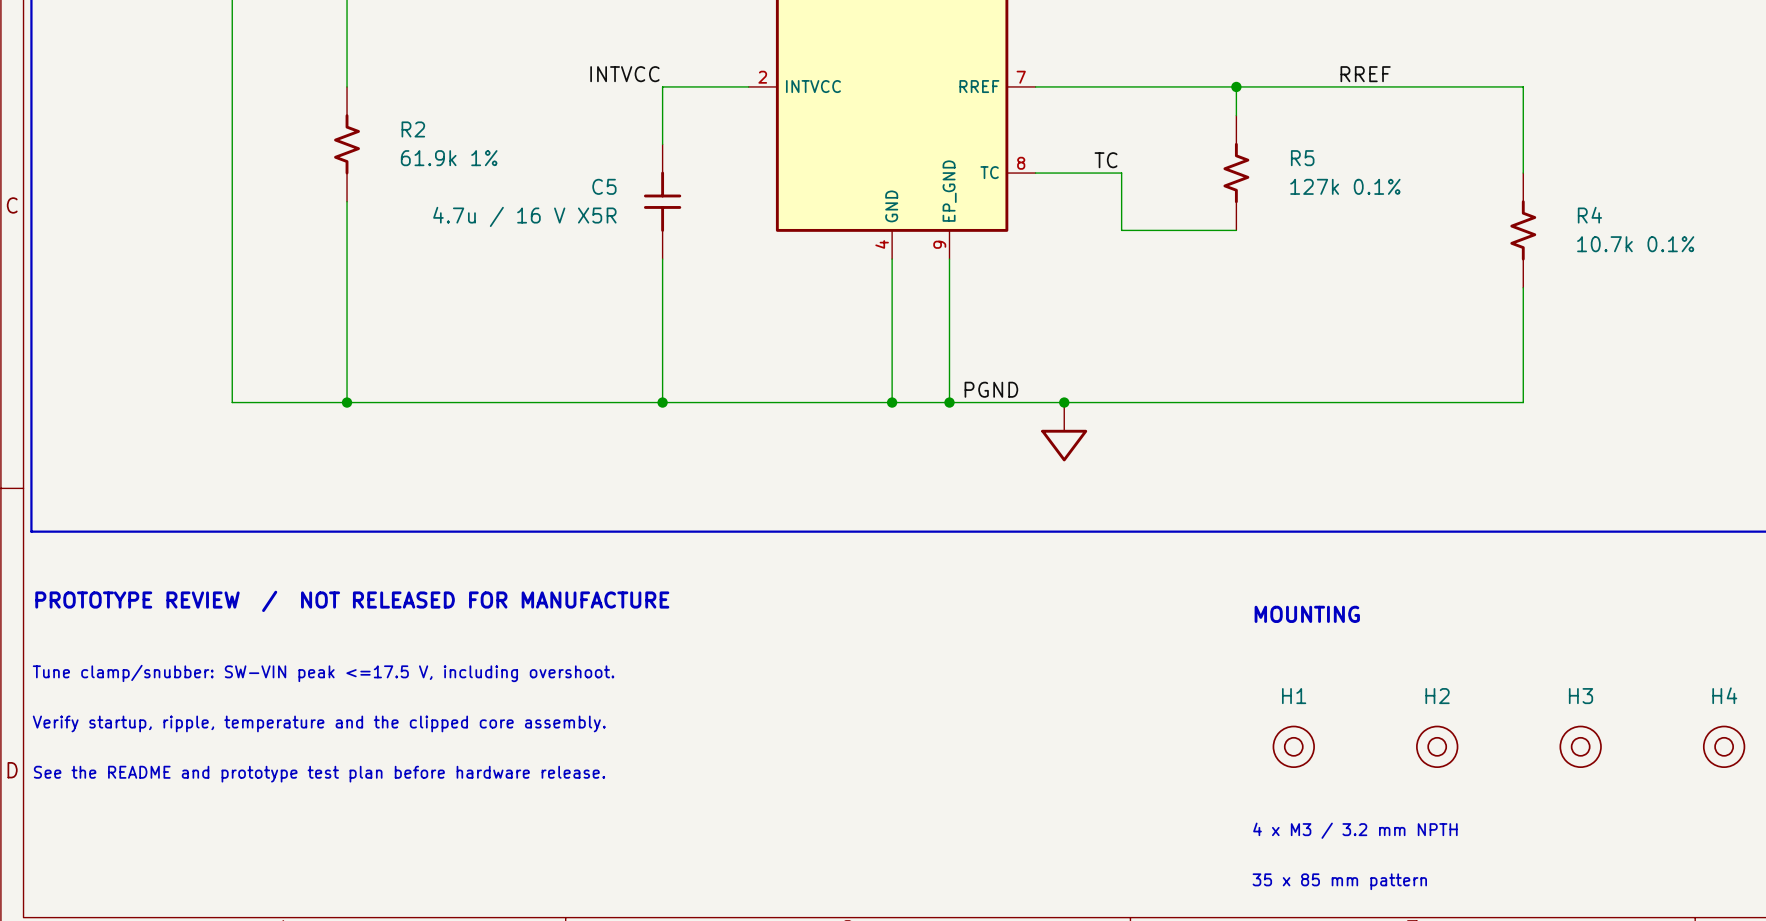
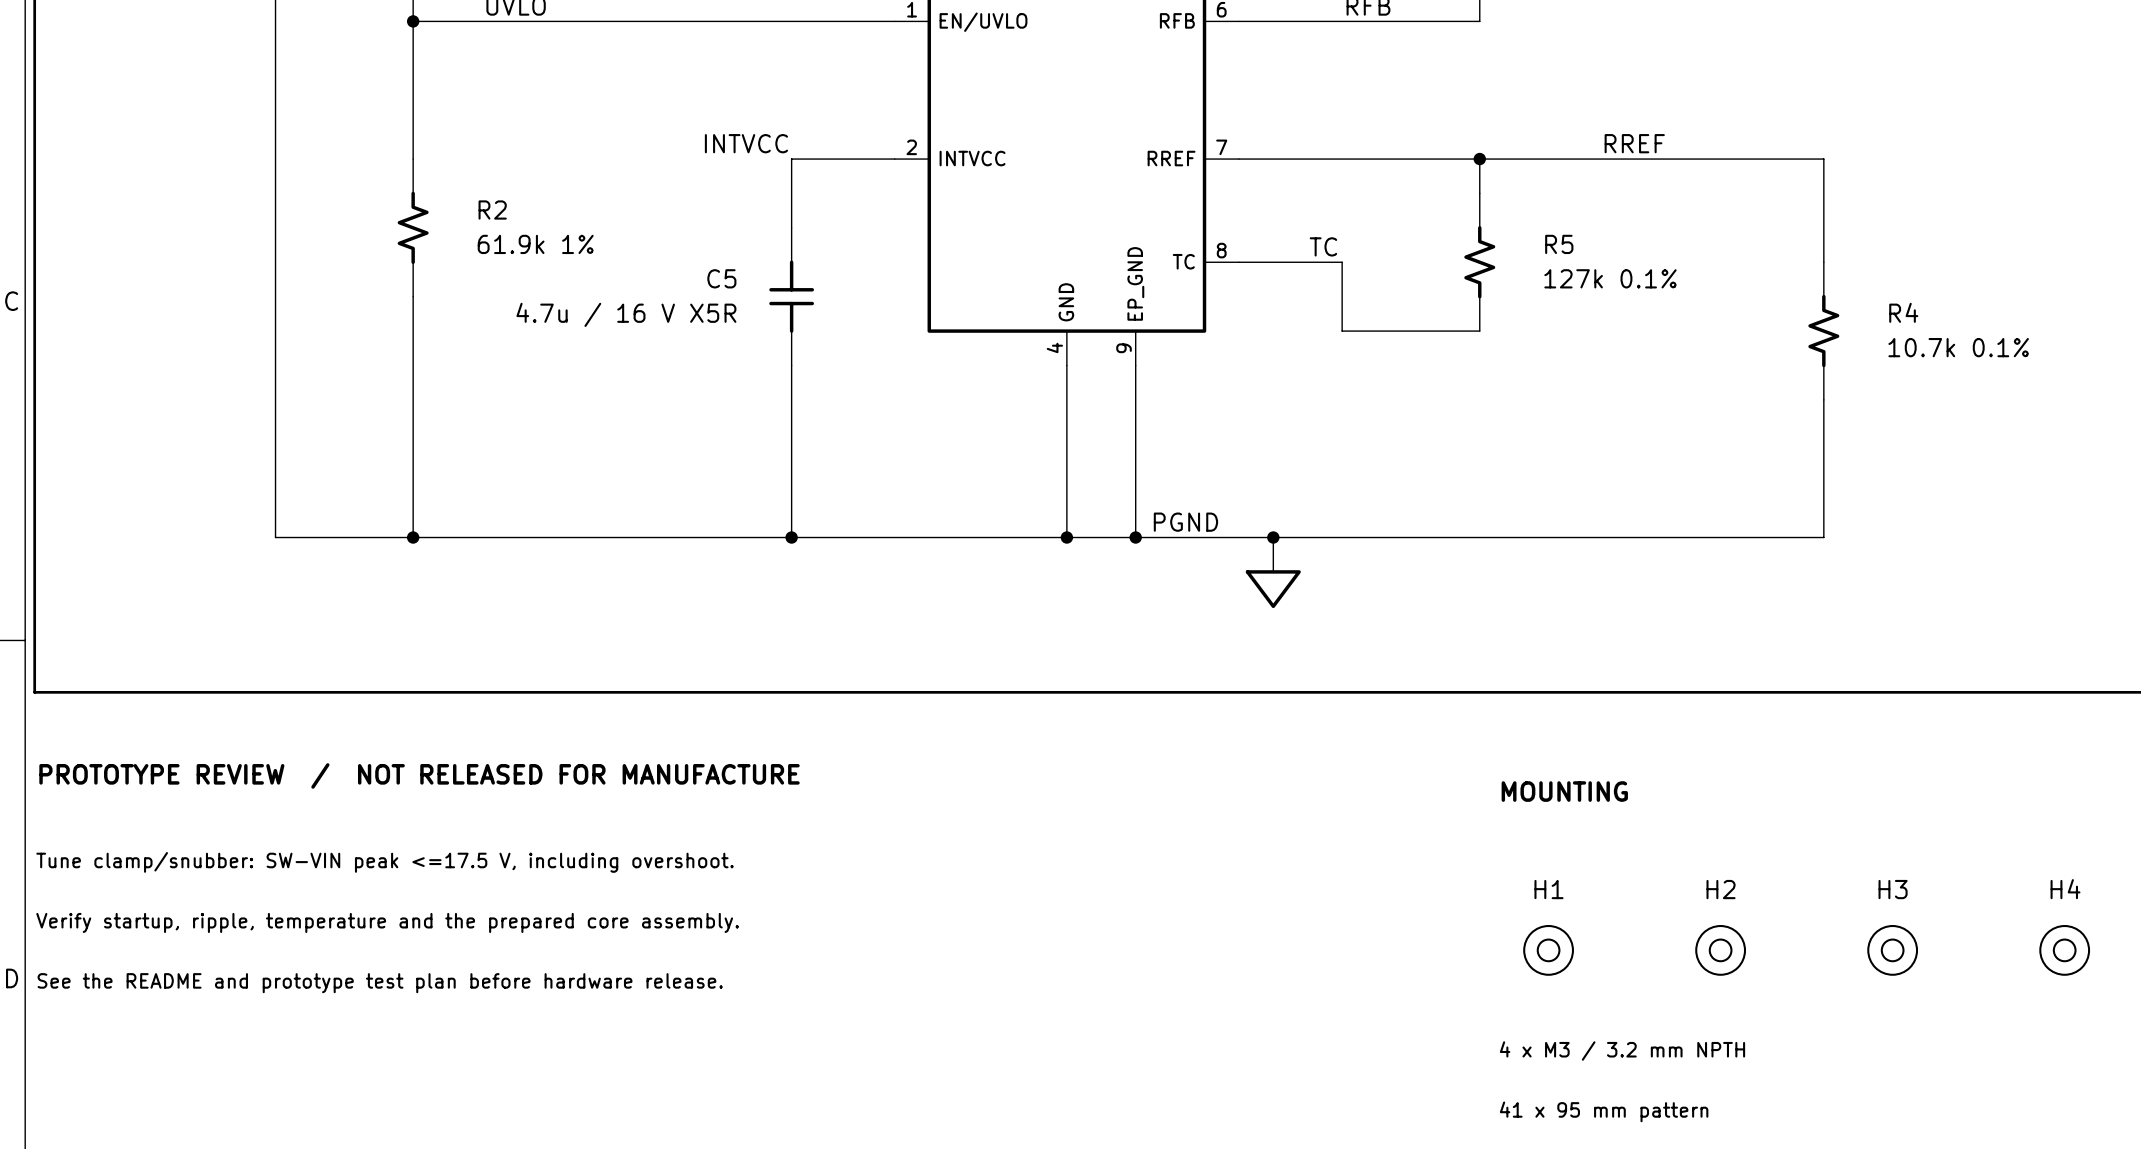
text: Verify startup, ripple, temperature and the clipped core assembly. (319, 723) -> Verify startup, ripple, temperature and the prepared core assembly. (387, 922)
text: 35 x 85 mm pattern (1339, 881) -> 41 x 95 mm pattern (1604, 1111)

